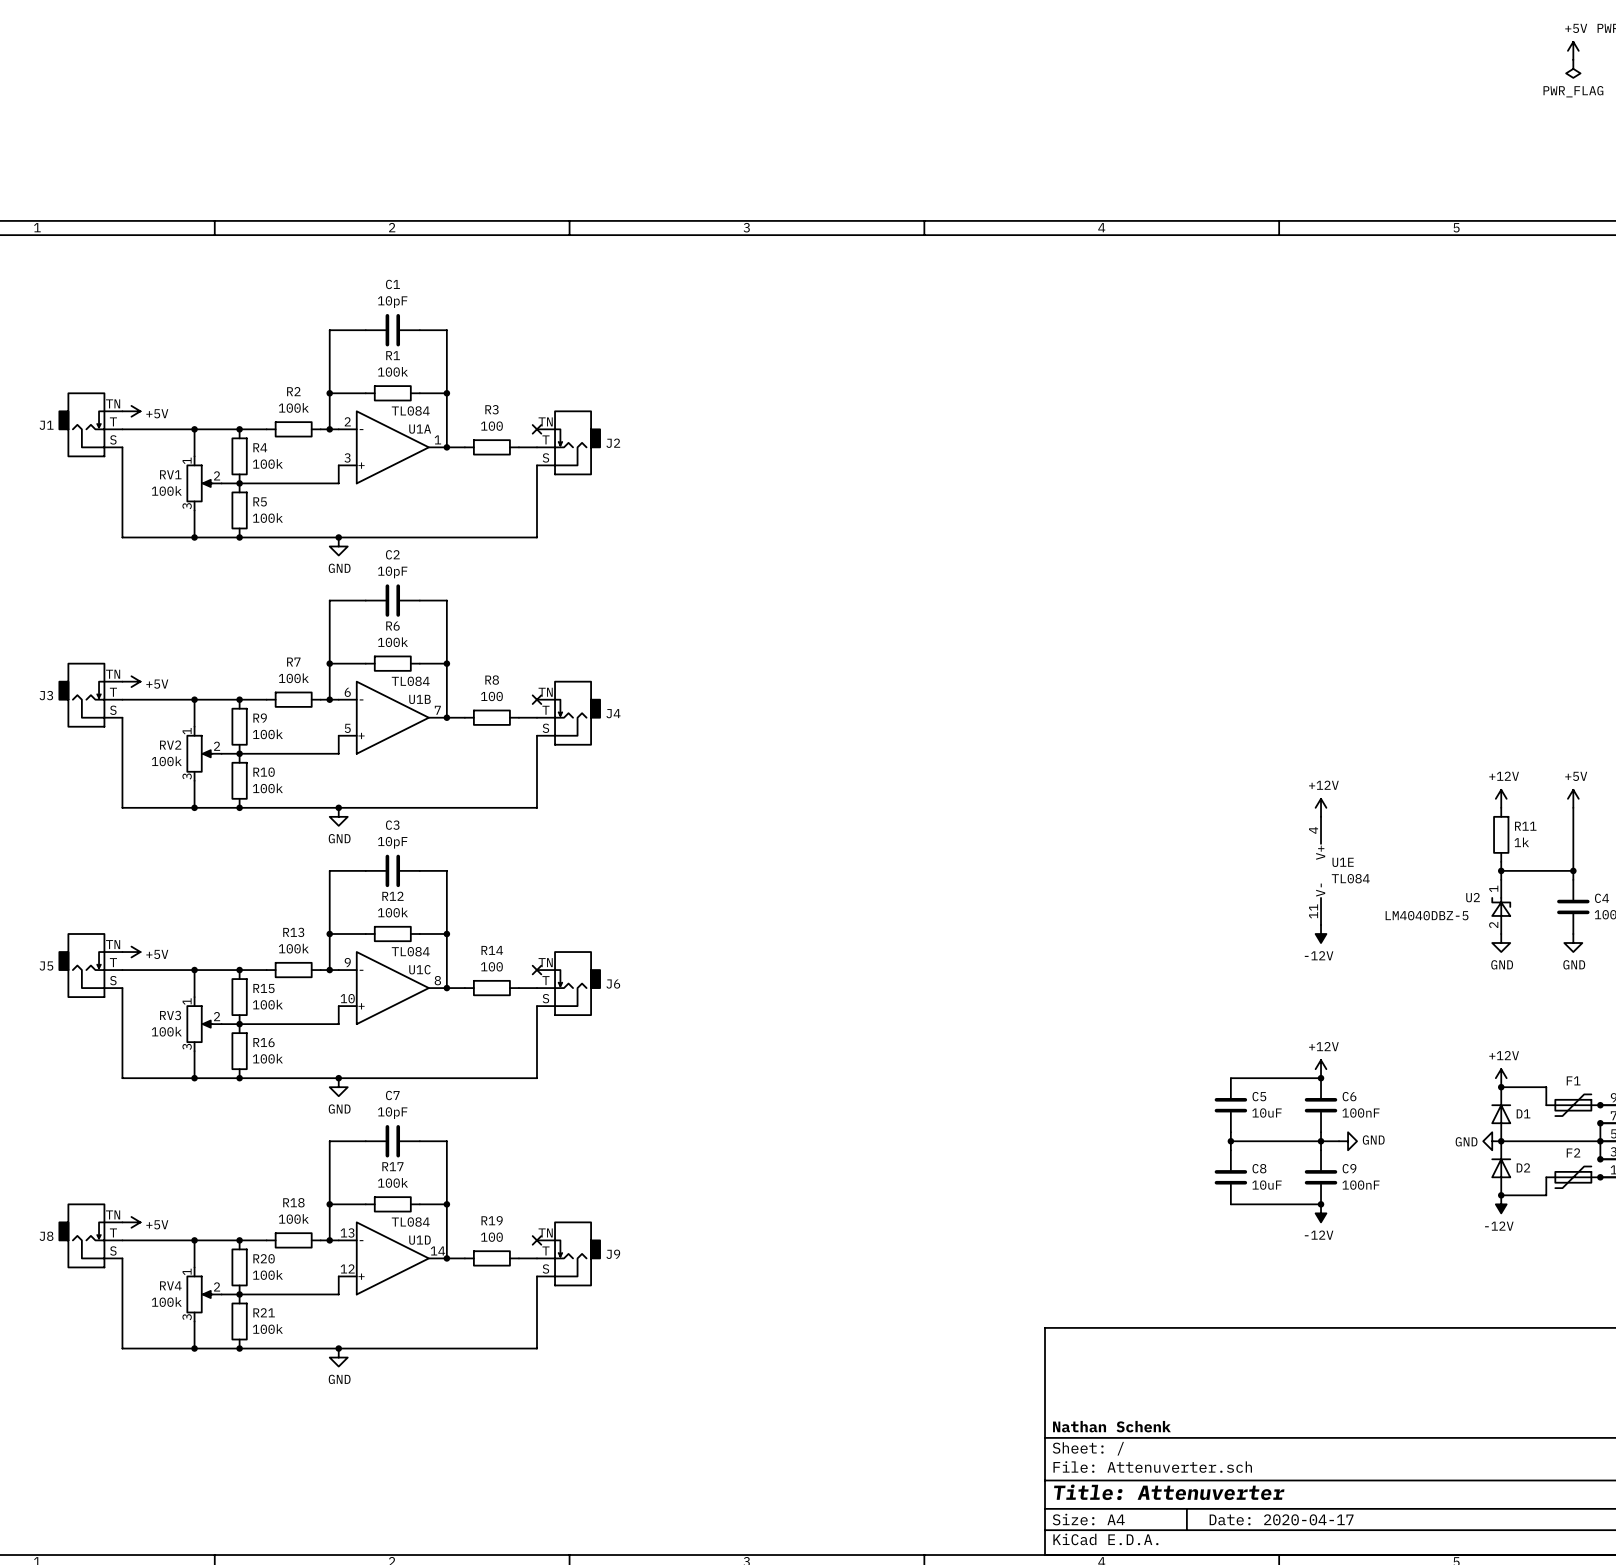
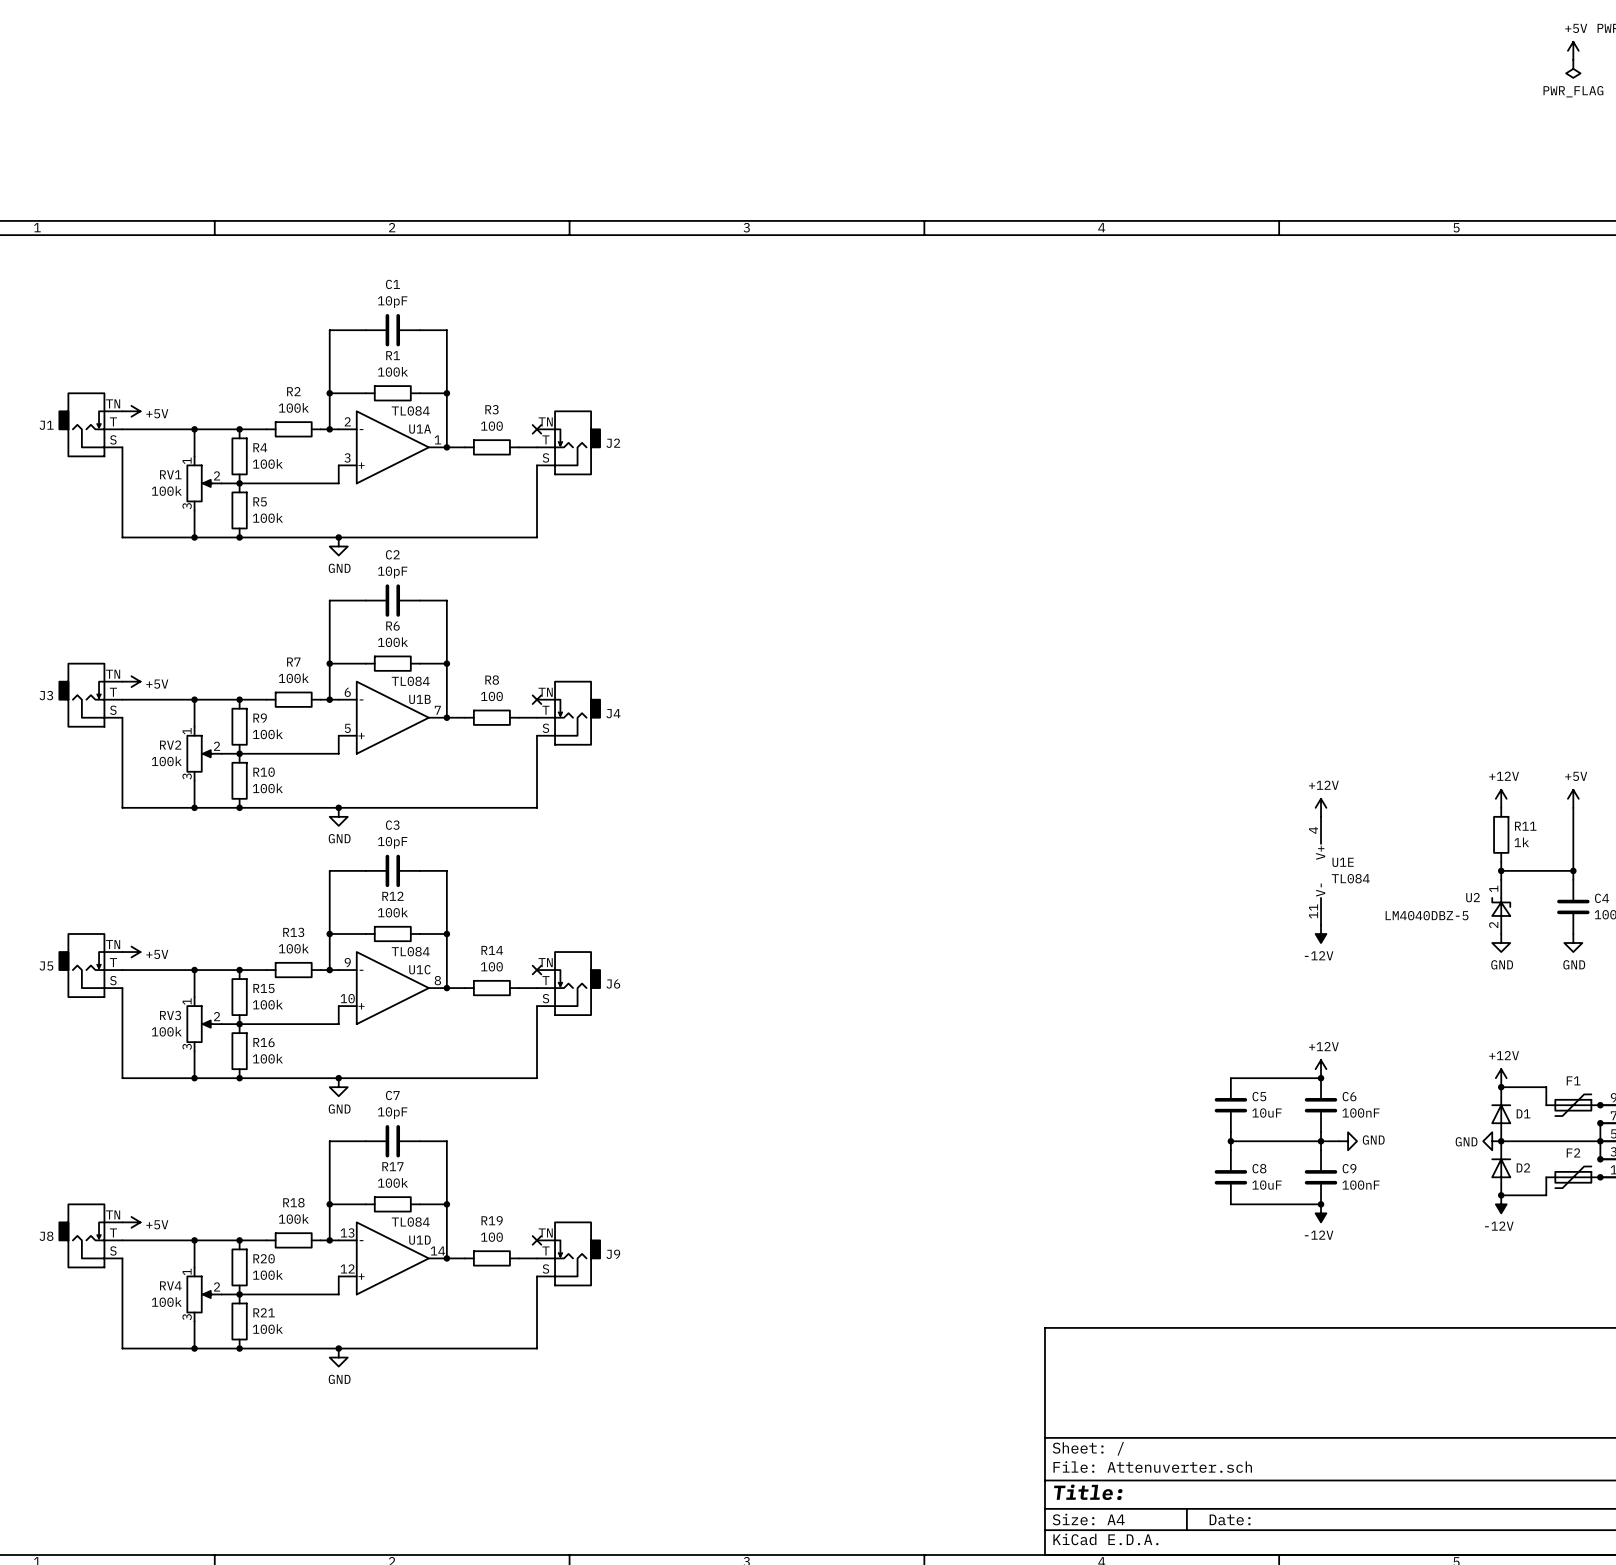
title block: Nathan Schenk (1111, 1426) -> none
title block: Title: Attenuverter (1169, 1492) -> Title: (1088, 1492)
title block: Date: 2020-04-17 (1281, 1519) -> Date: (1230, 1519)

